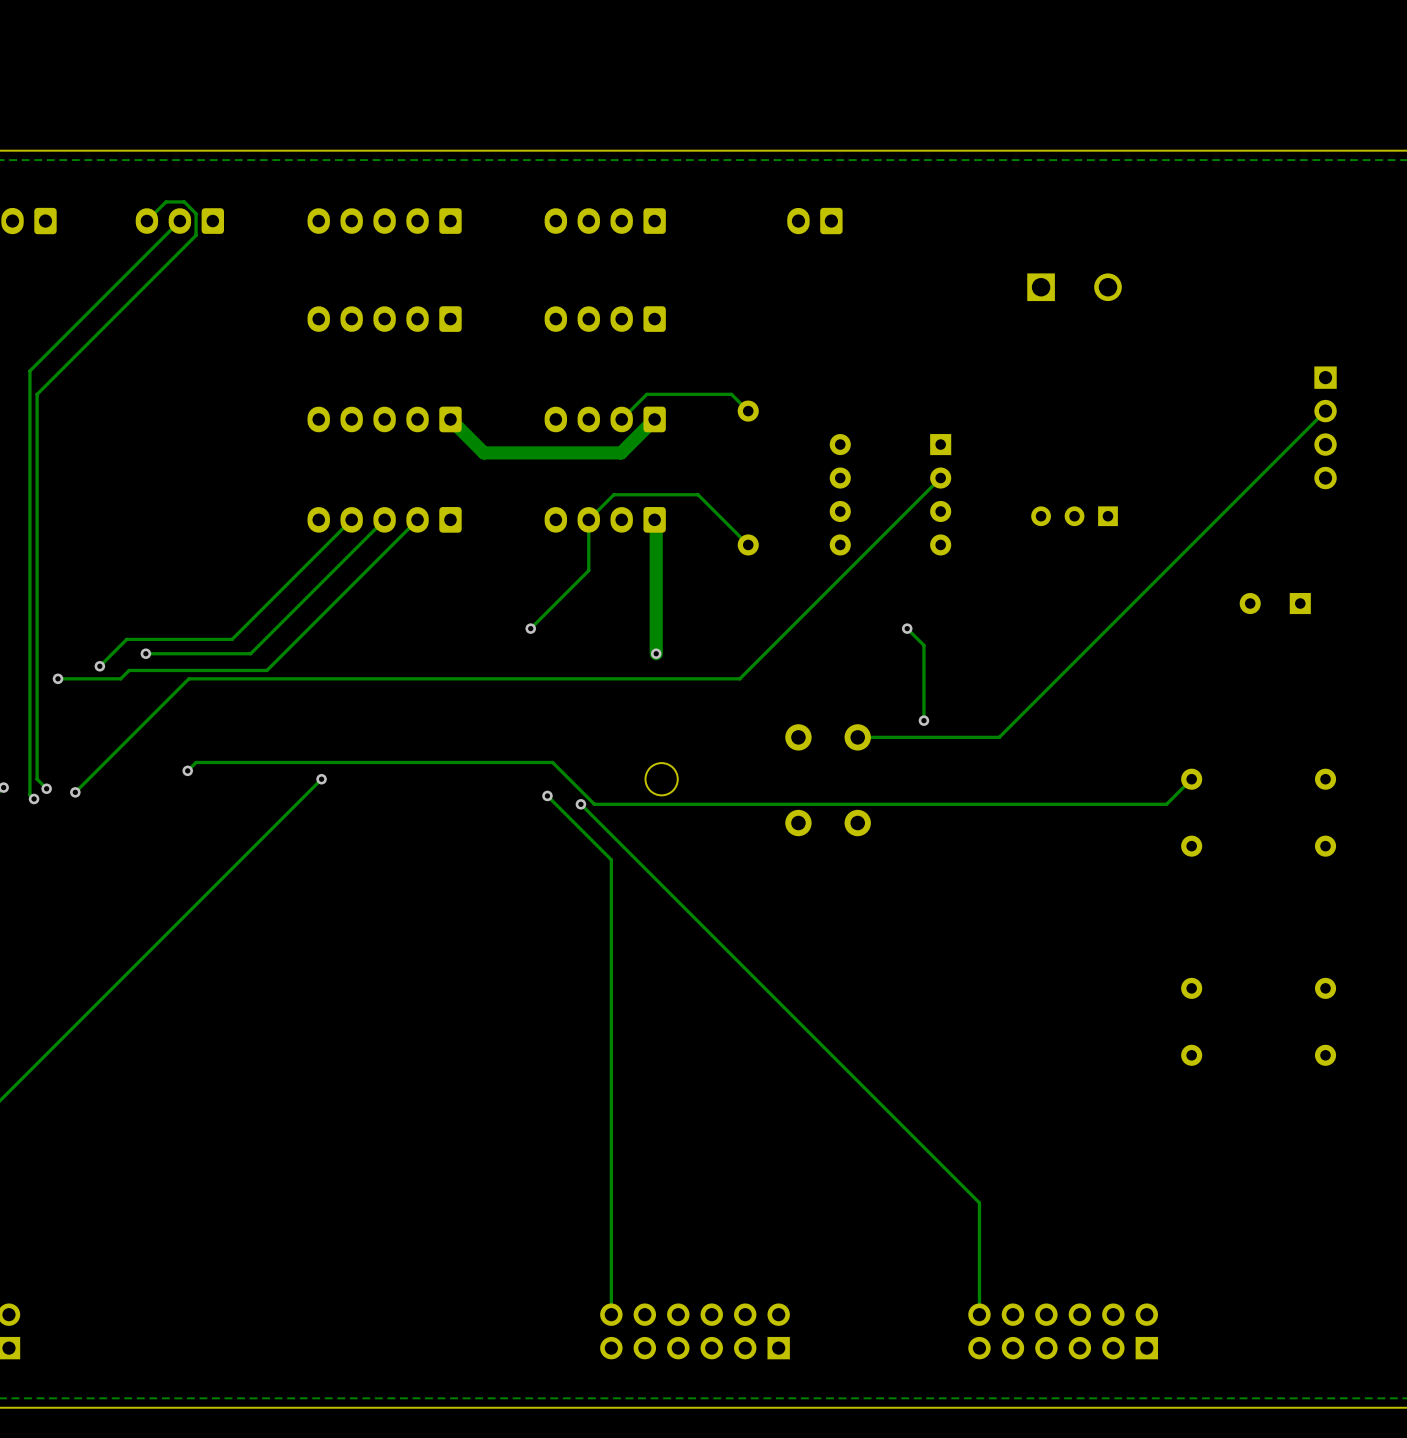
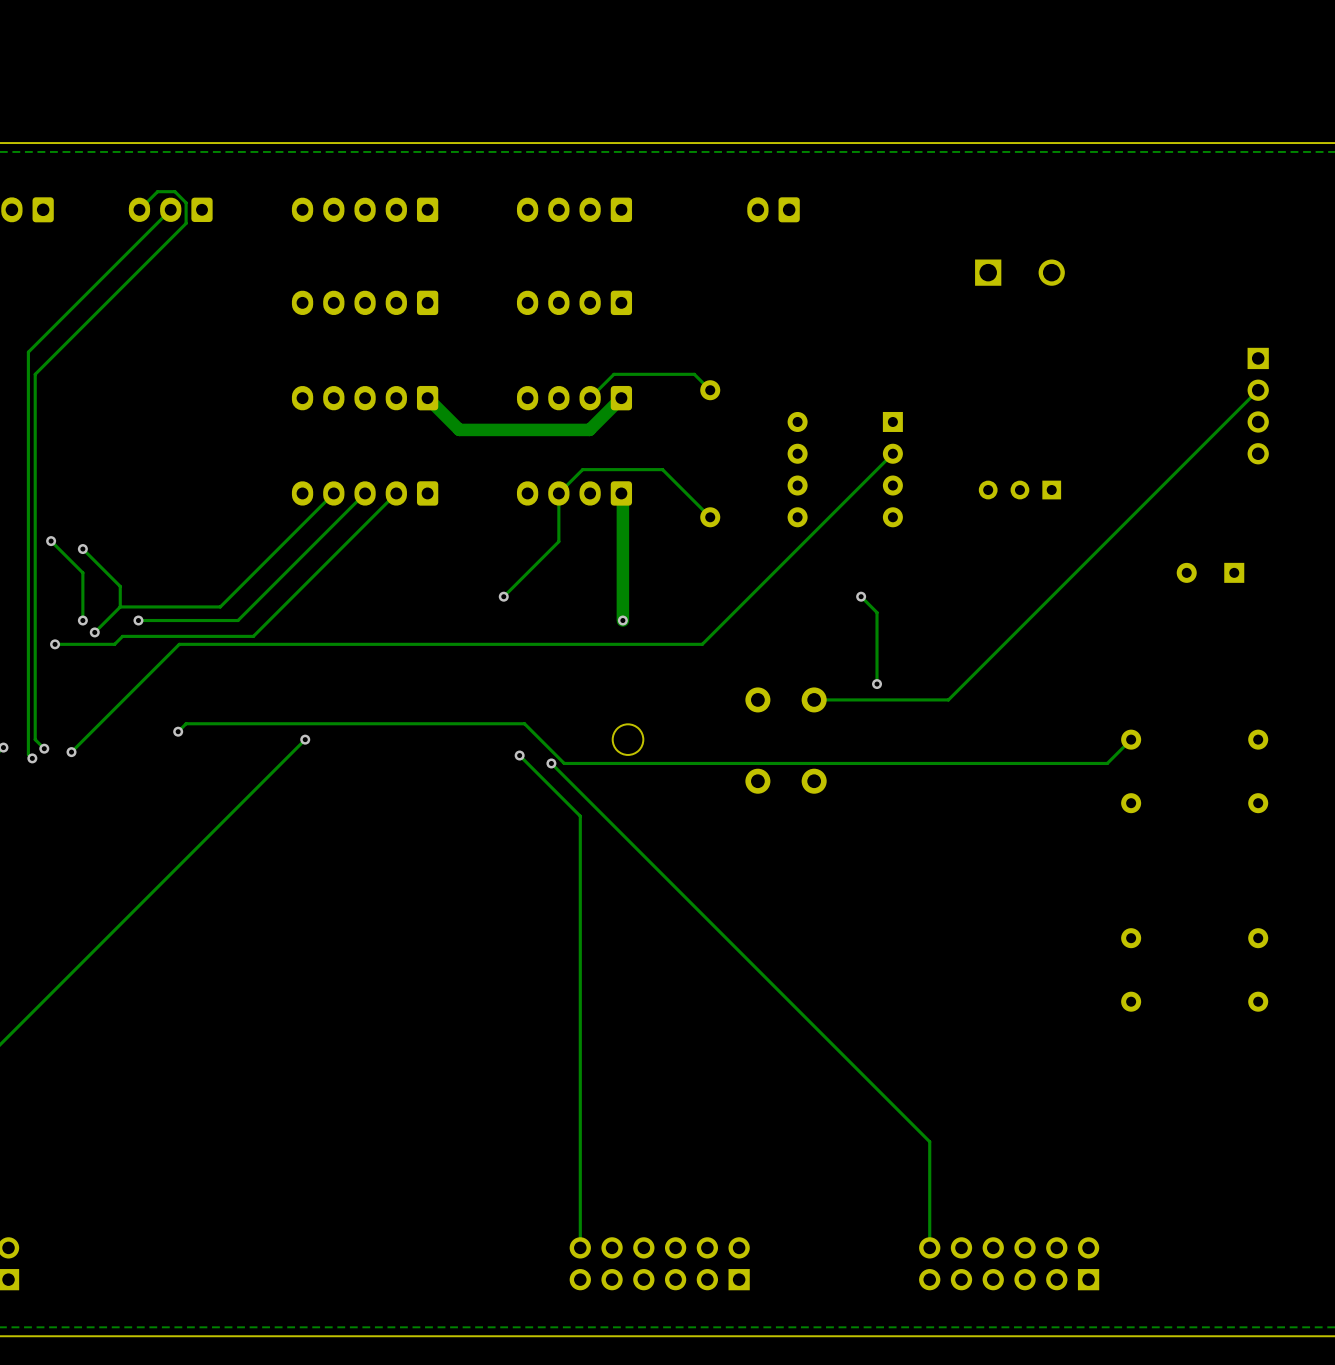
track: none -> (51, 541) (82, 572) (82, 620)
via: none -> (51, 541)
track: none -> (82, 549) (120, 586) (120, 606)
via: none -> (82, 549)
via: none -> (82, 620)

